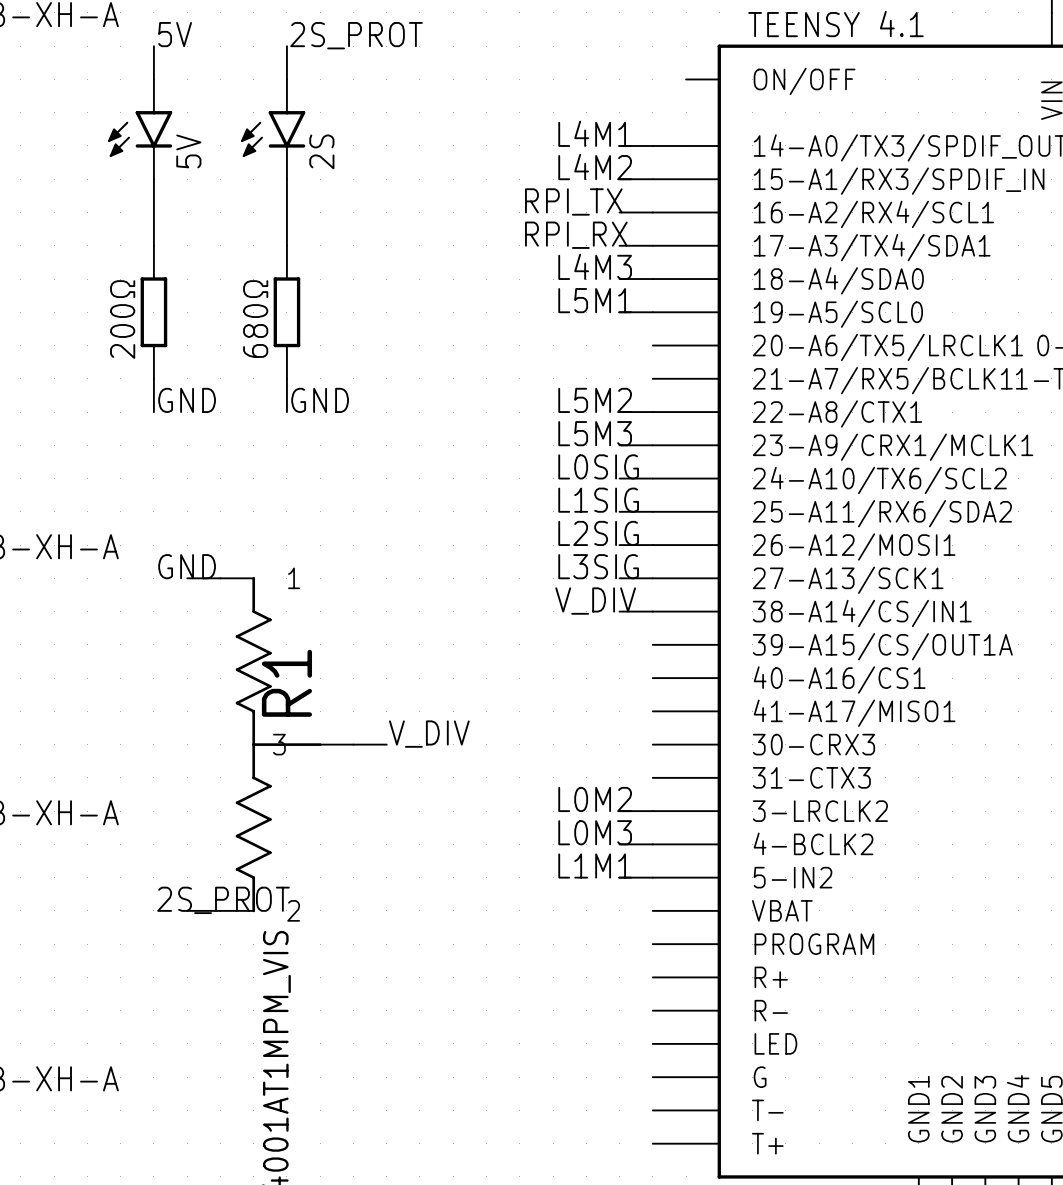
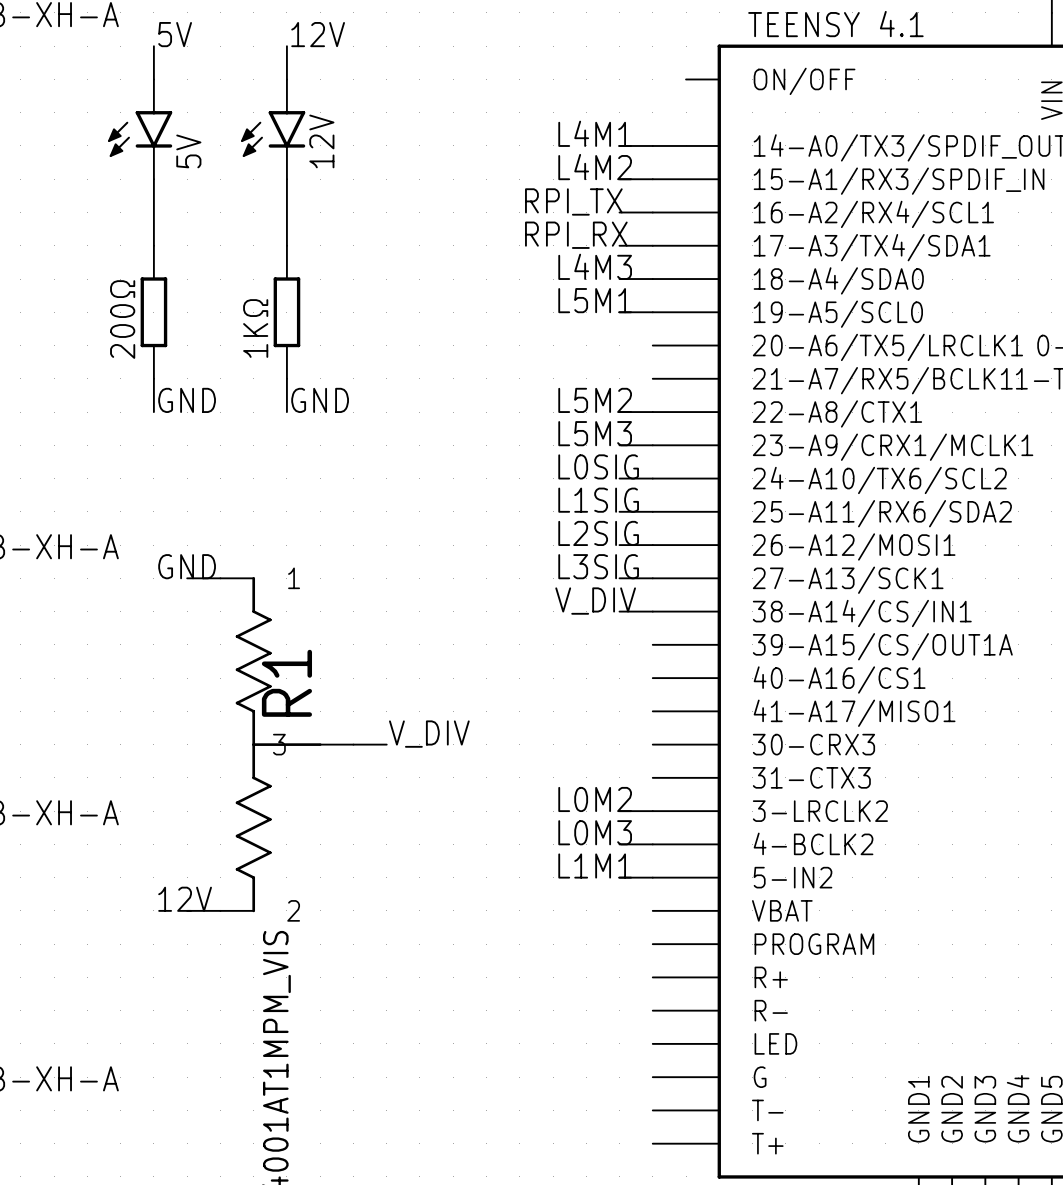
label: 2S_PROT (356, 35) -> 12V (318, 34)
2S name: 2S (321, 151) -> 12V (321, 141)
680Ω name: 680Ω (255, 319) -> 1KΩ (255, 328)
label: 2S_PROT (223, 900) -> 12V (185, 899)

